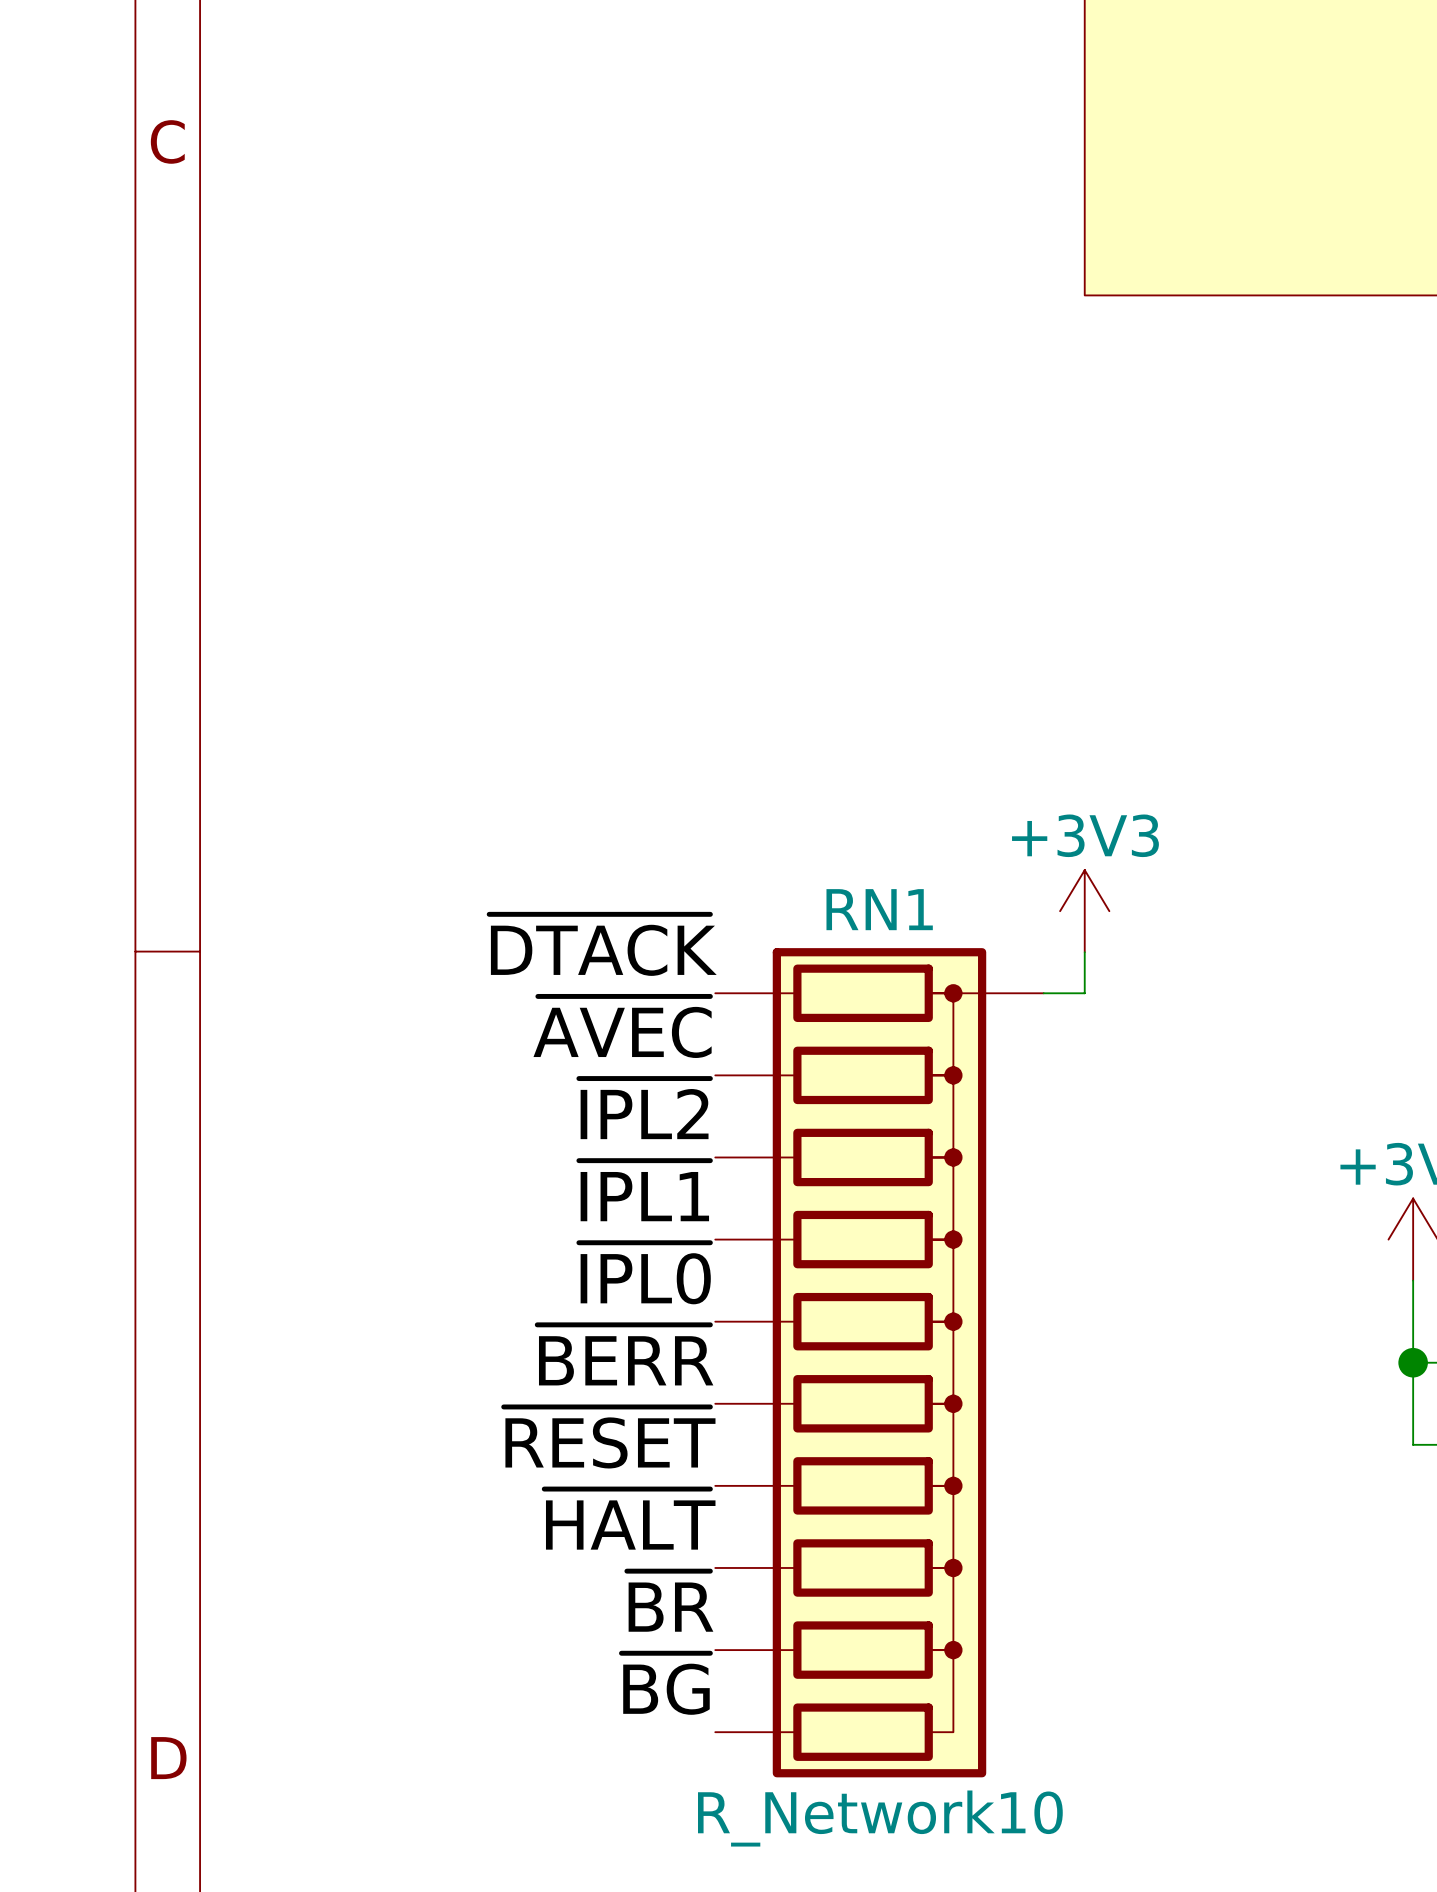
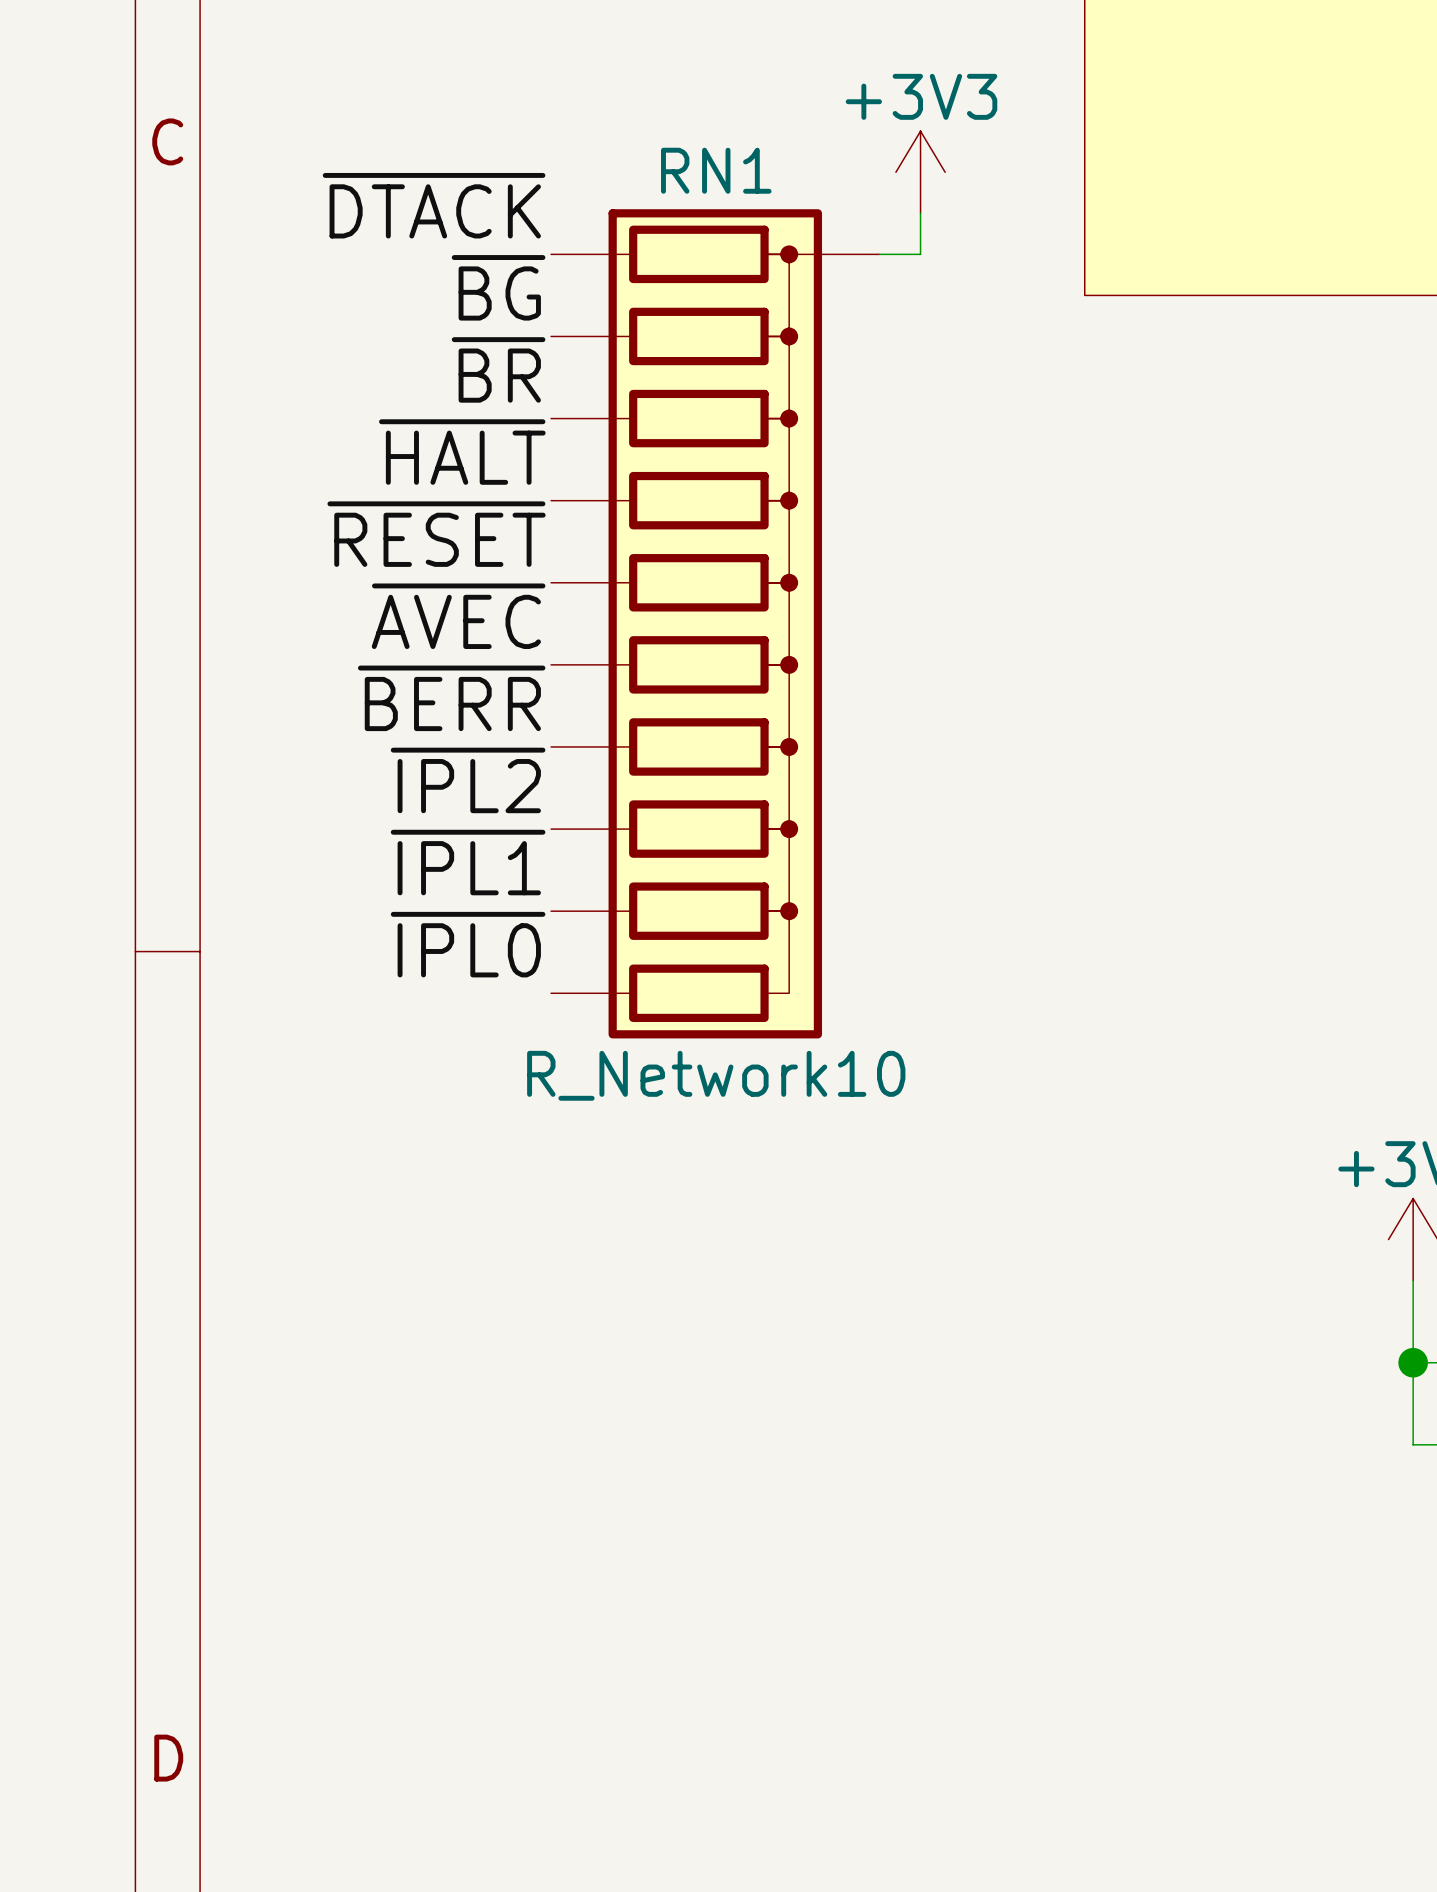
label: none -> ~{BG} (498, 287)
label: none -> ~{BR} (498, 369)
label: none -> ~{HALT} (462, 452)
label: none -> ~{RESET} (436, 534)
power symbol position: +3V3 (1084, 911) -> +3V3 (920, 172)
label position: ~{DTACK} (602, 945) -> ~{DTACK} (434, 205)
wire: (1084, 952) (1084, 993) (1043, 993) -> (920, 213) (920, 254) (879, 254)
label position: ~{AVEC} (622, 1027) -> ~{AVEC} (458, 616)
label position: ~{IPL2} (644, 1108) -> ~{IPL2} (468, 780)
label position: ~{IPL1} (644, 1190) -> ~{IPL1} (468, 862)
label position: ~{IPL0} (644, 1273) -> ~{IPL0} (468, 944)
label position: ~{BERR} (625, 1355) -> ~{BERR} (451, 698)
RN1 position: (879, 1362) -> (715, 623)
label: ~{RESET} (609, 1437) -> none
label: ~{HALT} (629, 1519) -> none
label: ~{BR} (670, 1601) -> none
label: ~{BG} (665, 1684) -> none

